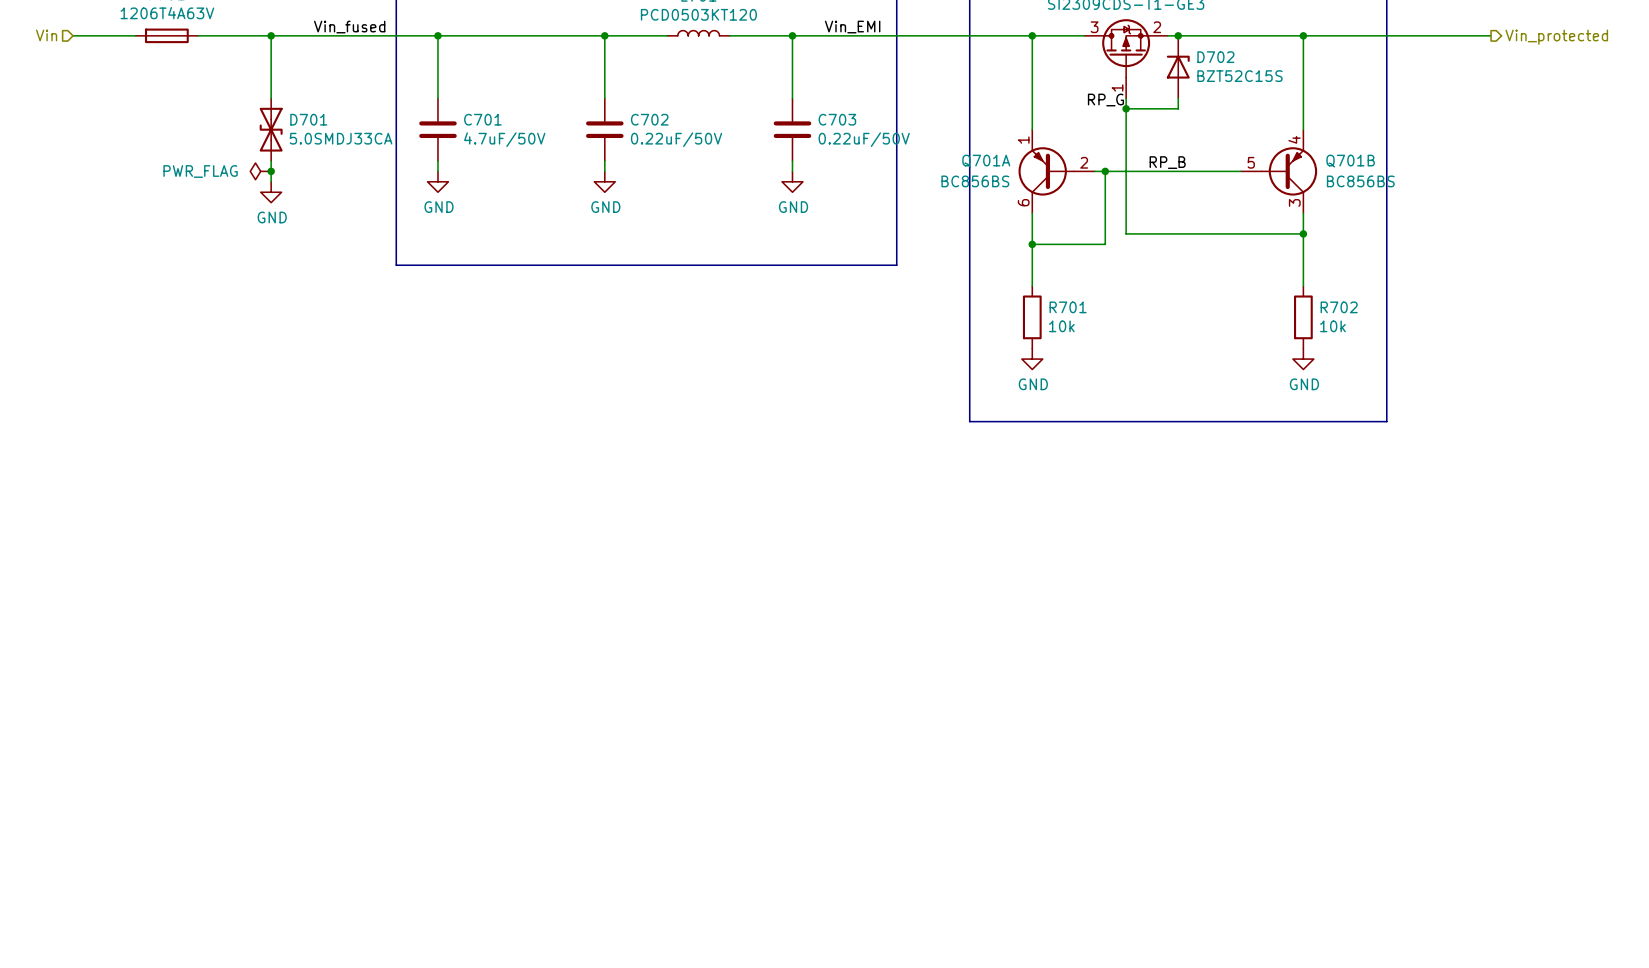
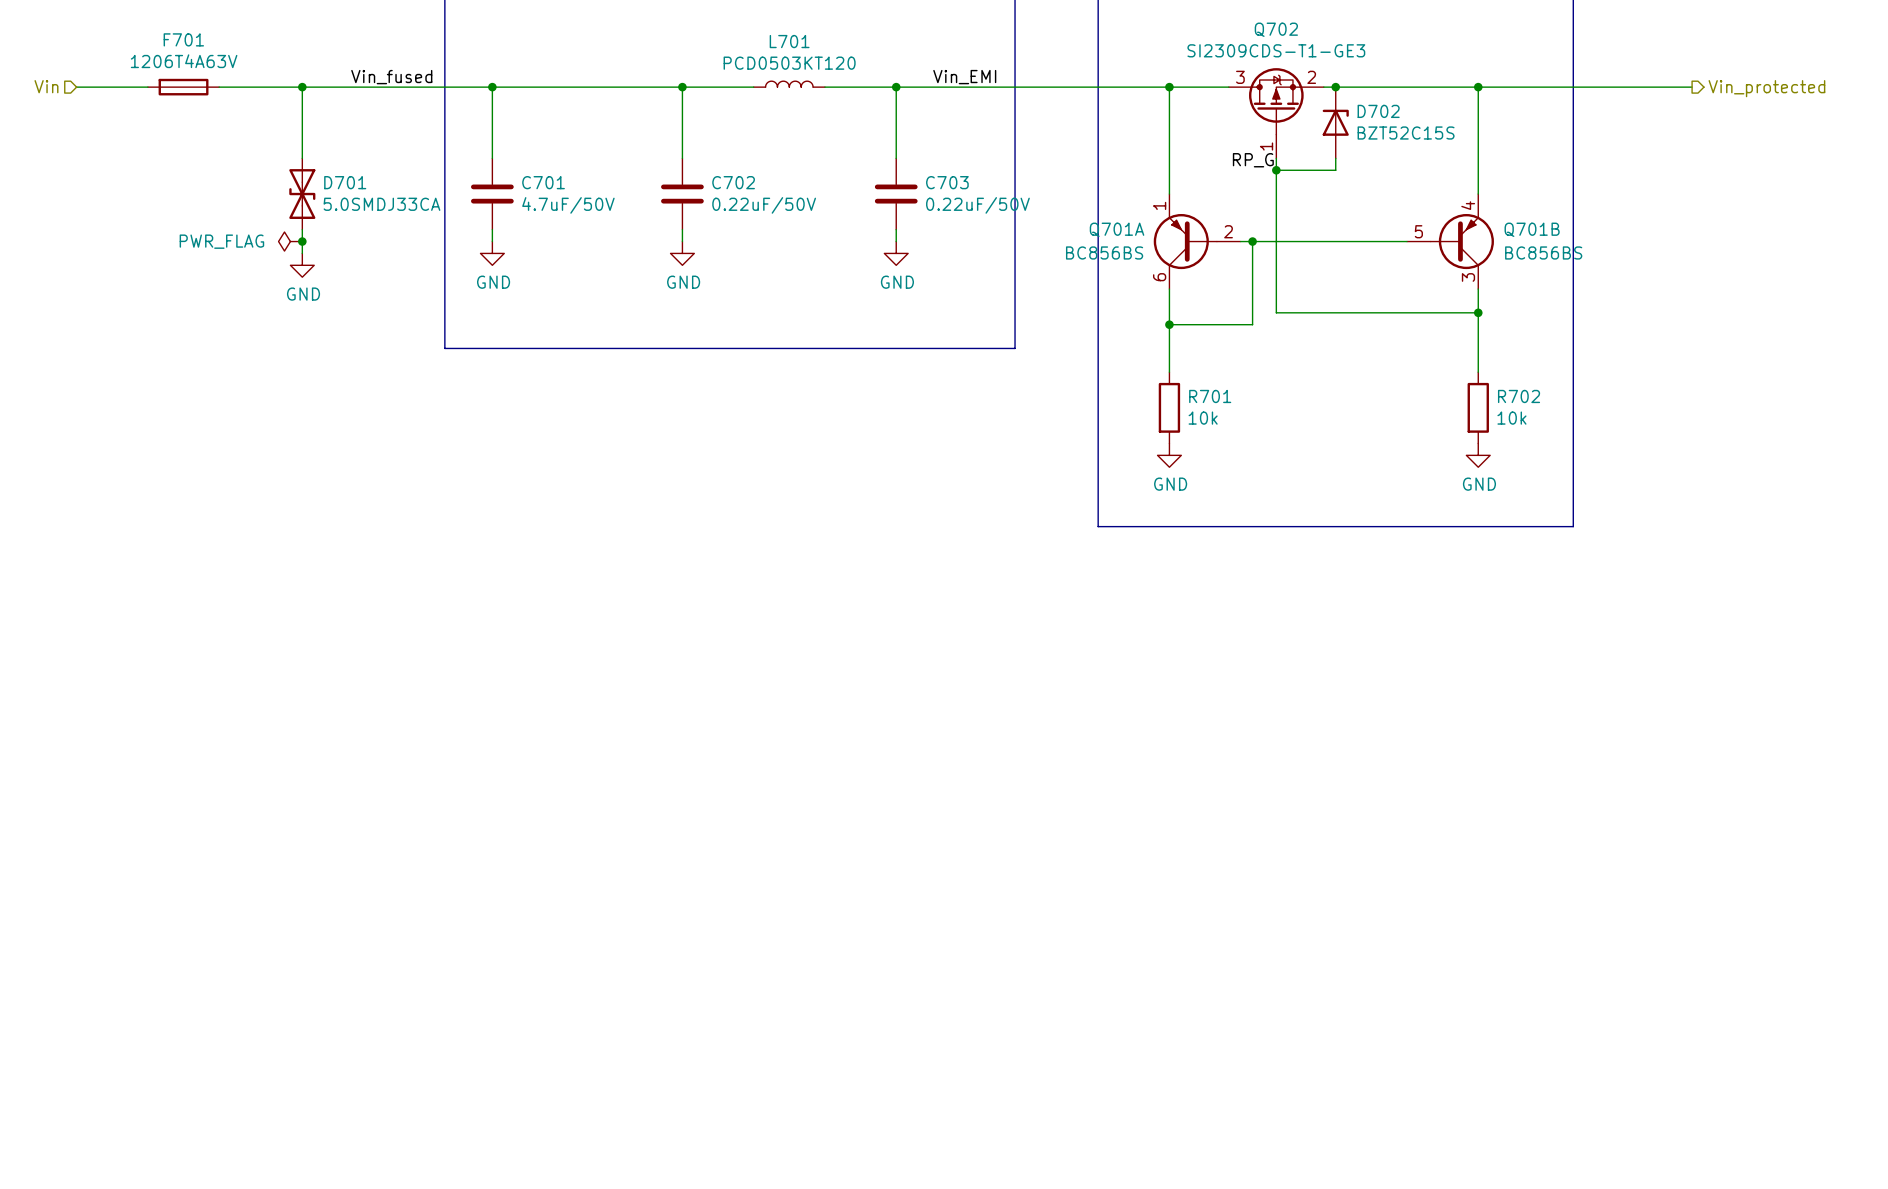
label: RP_B (1167, 162) -> none

